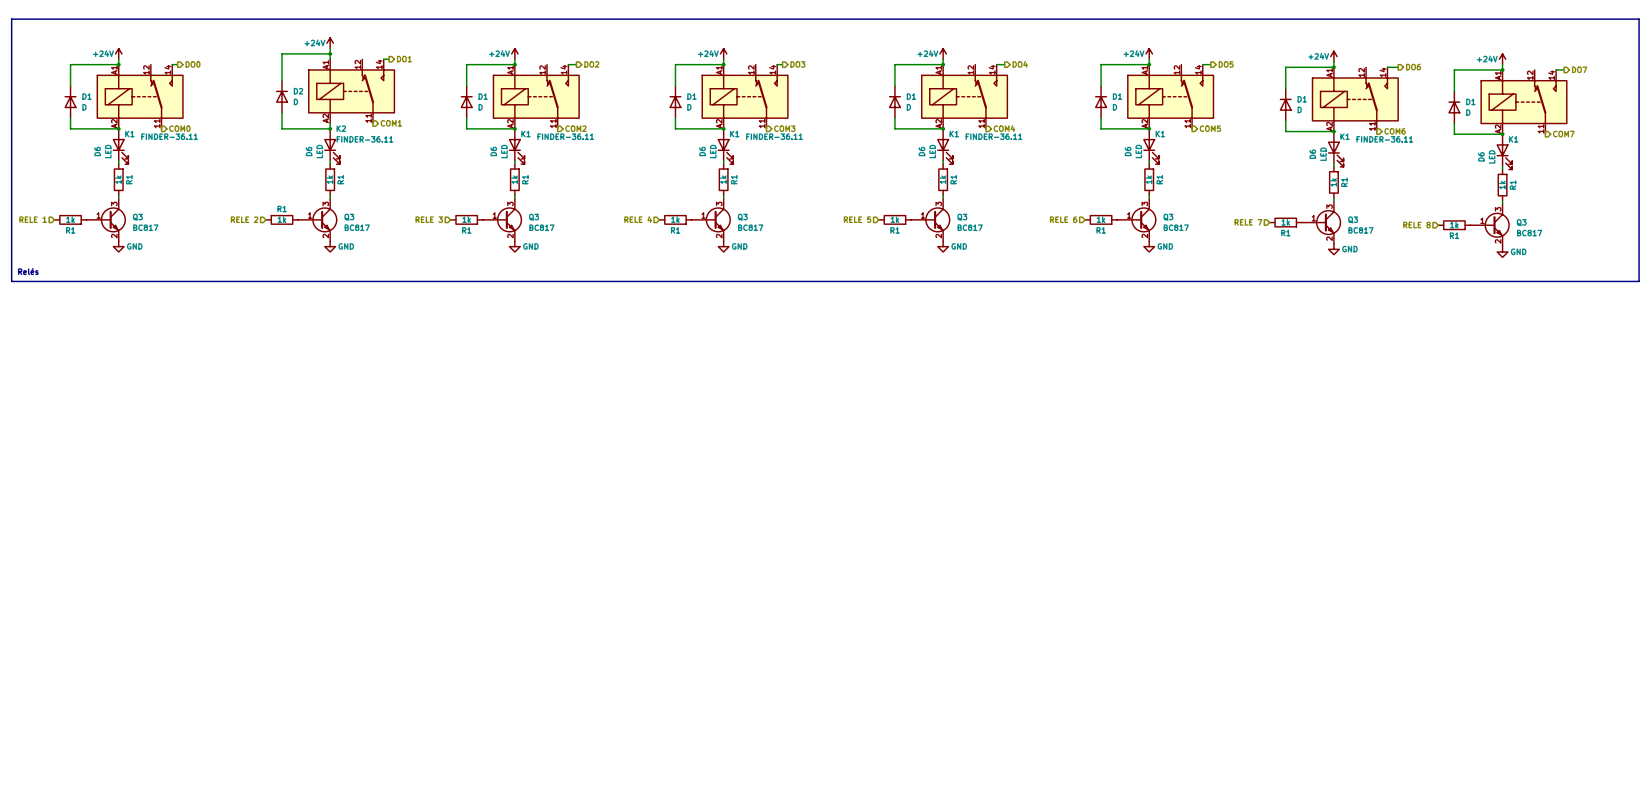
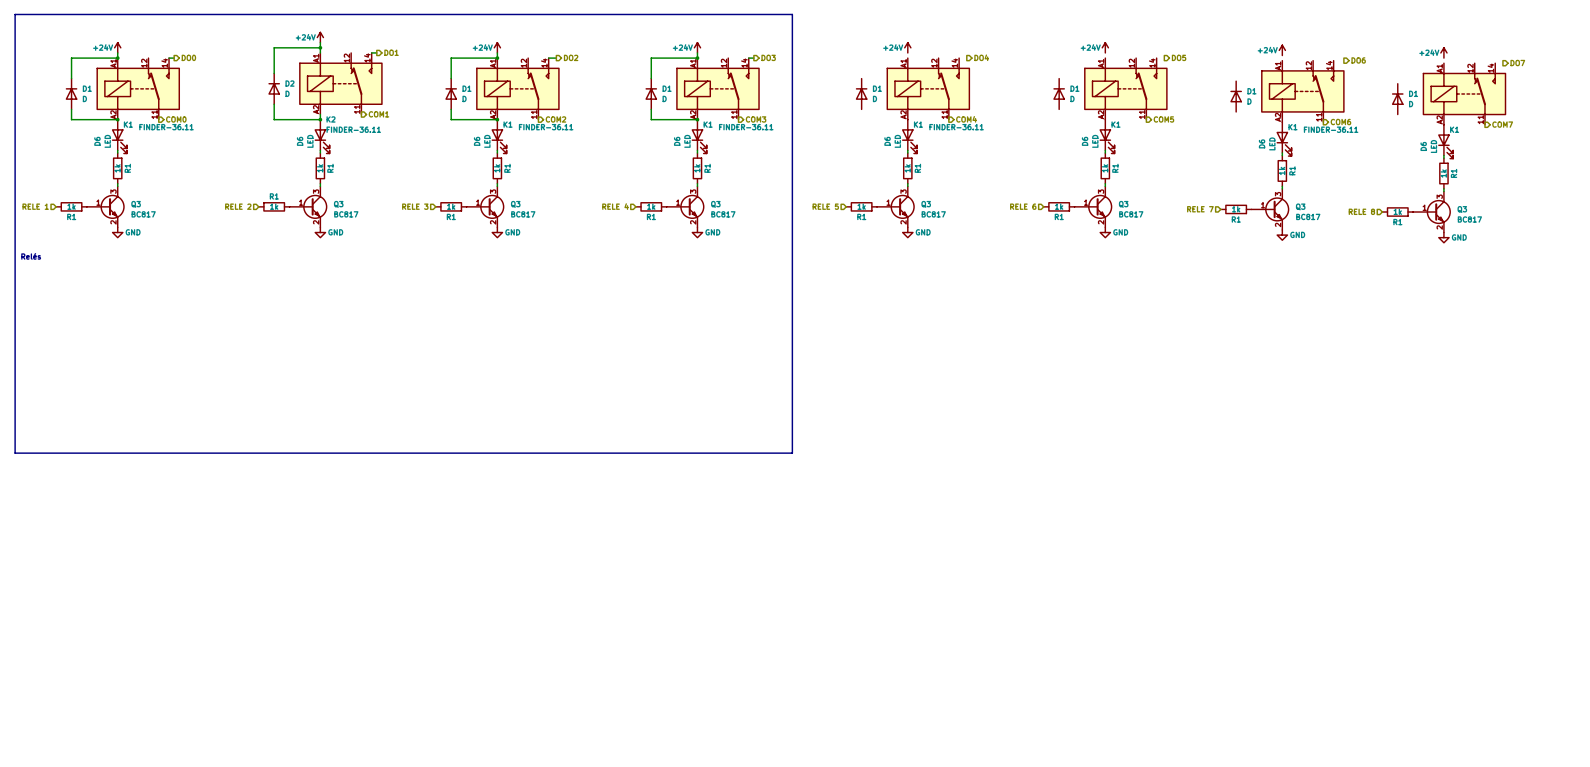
line: (822, 19) (1639, 19) (1639, 281) (11, 281) -> (792, 14) (792, 453) (15, 453) (15, 265)
wire: (943, 59) (943, 64) (894, 64) (894, 86) -> none
wire: (1149, 59) (1149, 64) (1101, 64) (1101, 86) -> none
wire: (1333, 61) (1333, 67) (1285, 67) (1285, 88) -> none
junction: (943, 64) -> none
wire: (996, 64) (1004, 64) -> none
junction: (1149, 64) -> none
wire: (1202, 64) (1210, 64) -> none
wire: (1502, 64) (1502, 69) (1454, 69) (1454, 91) -> none
junction: (1333, 67) -> none
wire: (1387, 67) (1398, 67) -> none
junction: (1502, 69) -> none
wire: (1556, 69) (1564, 69) -> none
wire: (894, 118) (894, 128) (943, 128) -> none
wire: (1101, 118) (1101, 128) (1149, 128) -> none
wire: (1285, 120) (1285, 131) (1333, 131) -> none
wire: (1454, 123) (1454, 134) (1502, 134) -> none
junction: (943, 128) -> none
junction: (1149, 128) -> none
junction: (1333, 131) -> none
junction: (1502, 134) -> none

